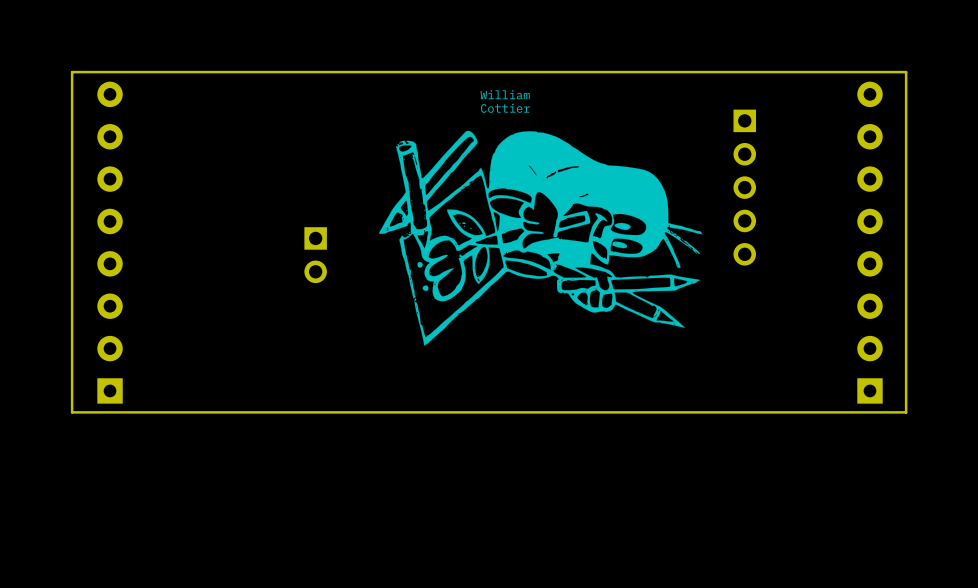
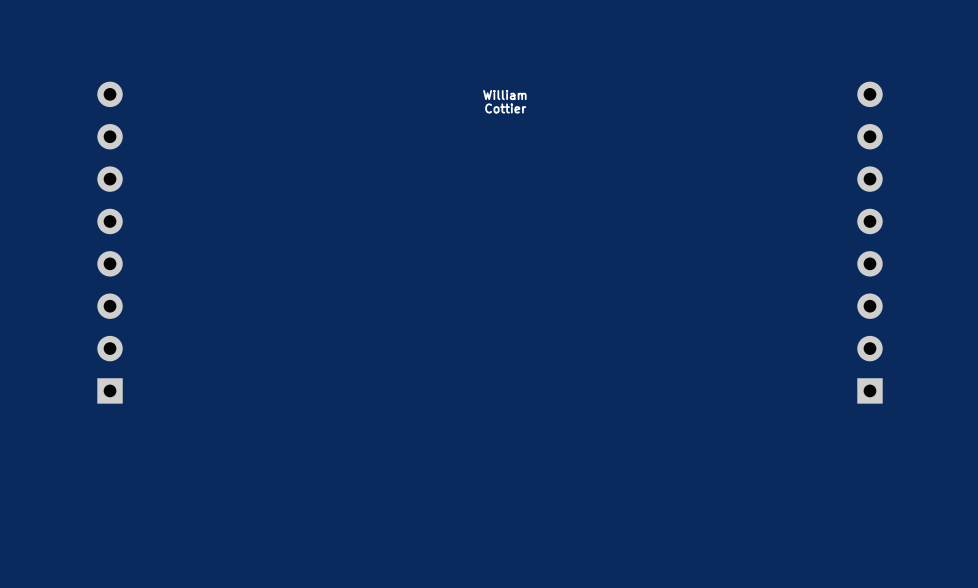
board edge: (906, 72) (906, 412) (72, 412) (72, 72) (906, 72) -> none
drawing: [378, 130, 703, 346] -> none
part: (744, 187) -> none
part: (315, 255) -> none

